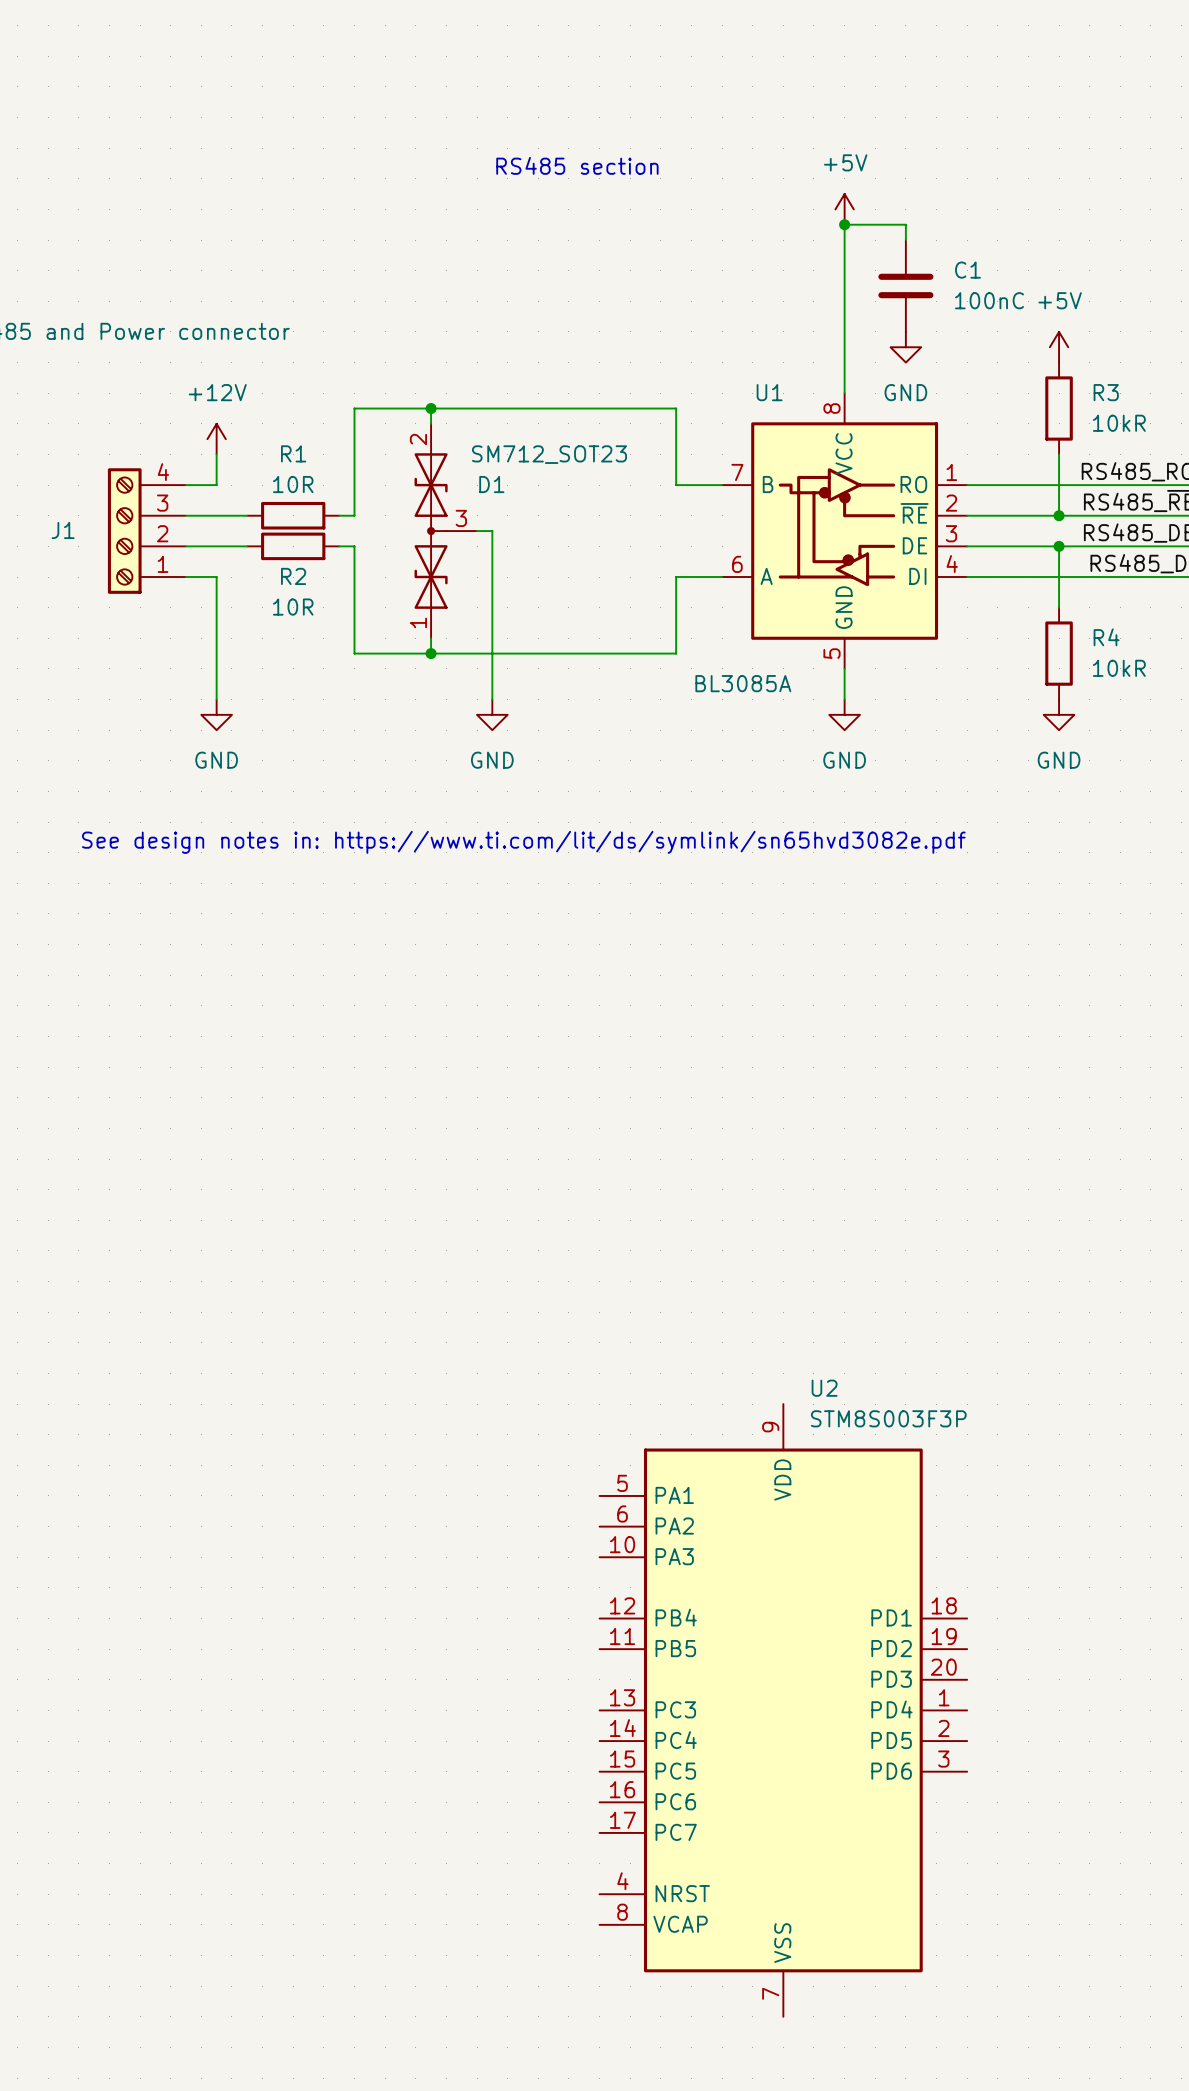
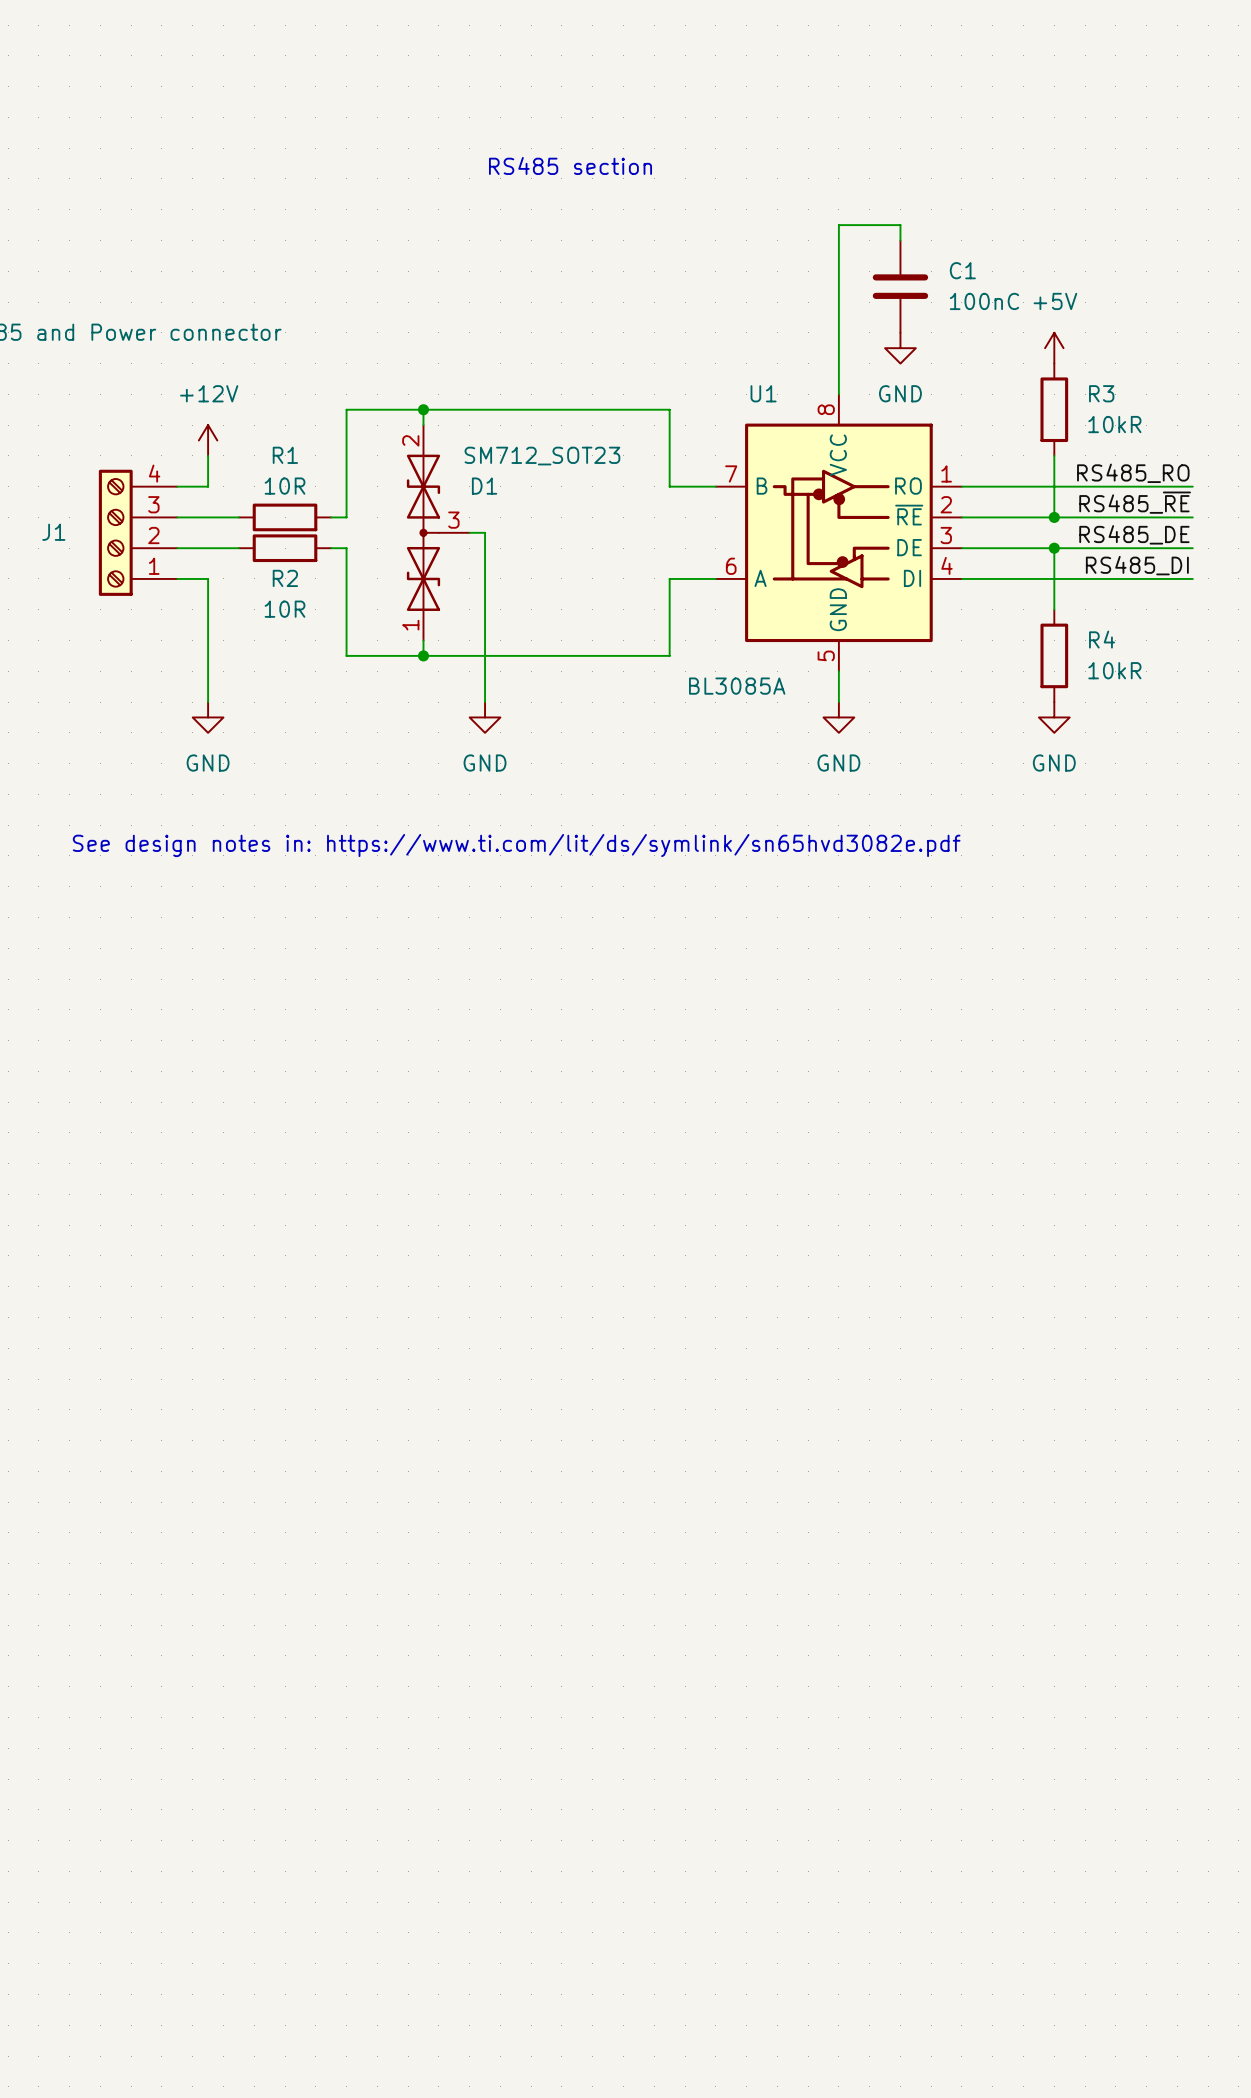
power symbol: +5V (844, 209) -> none
junction: (844, 224) -> none
U2: STM8S003F3P (783, 1710) -> none

